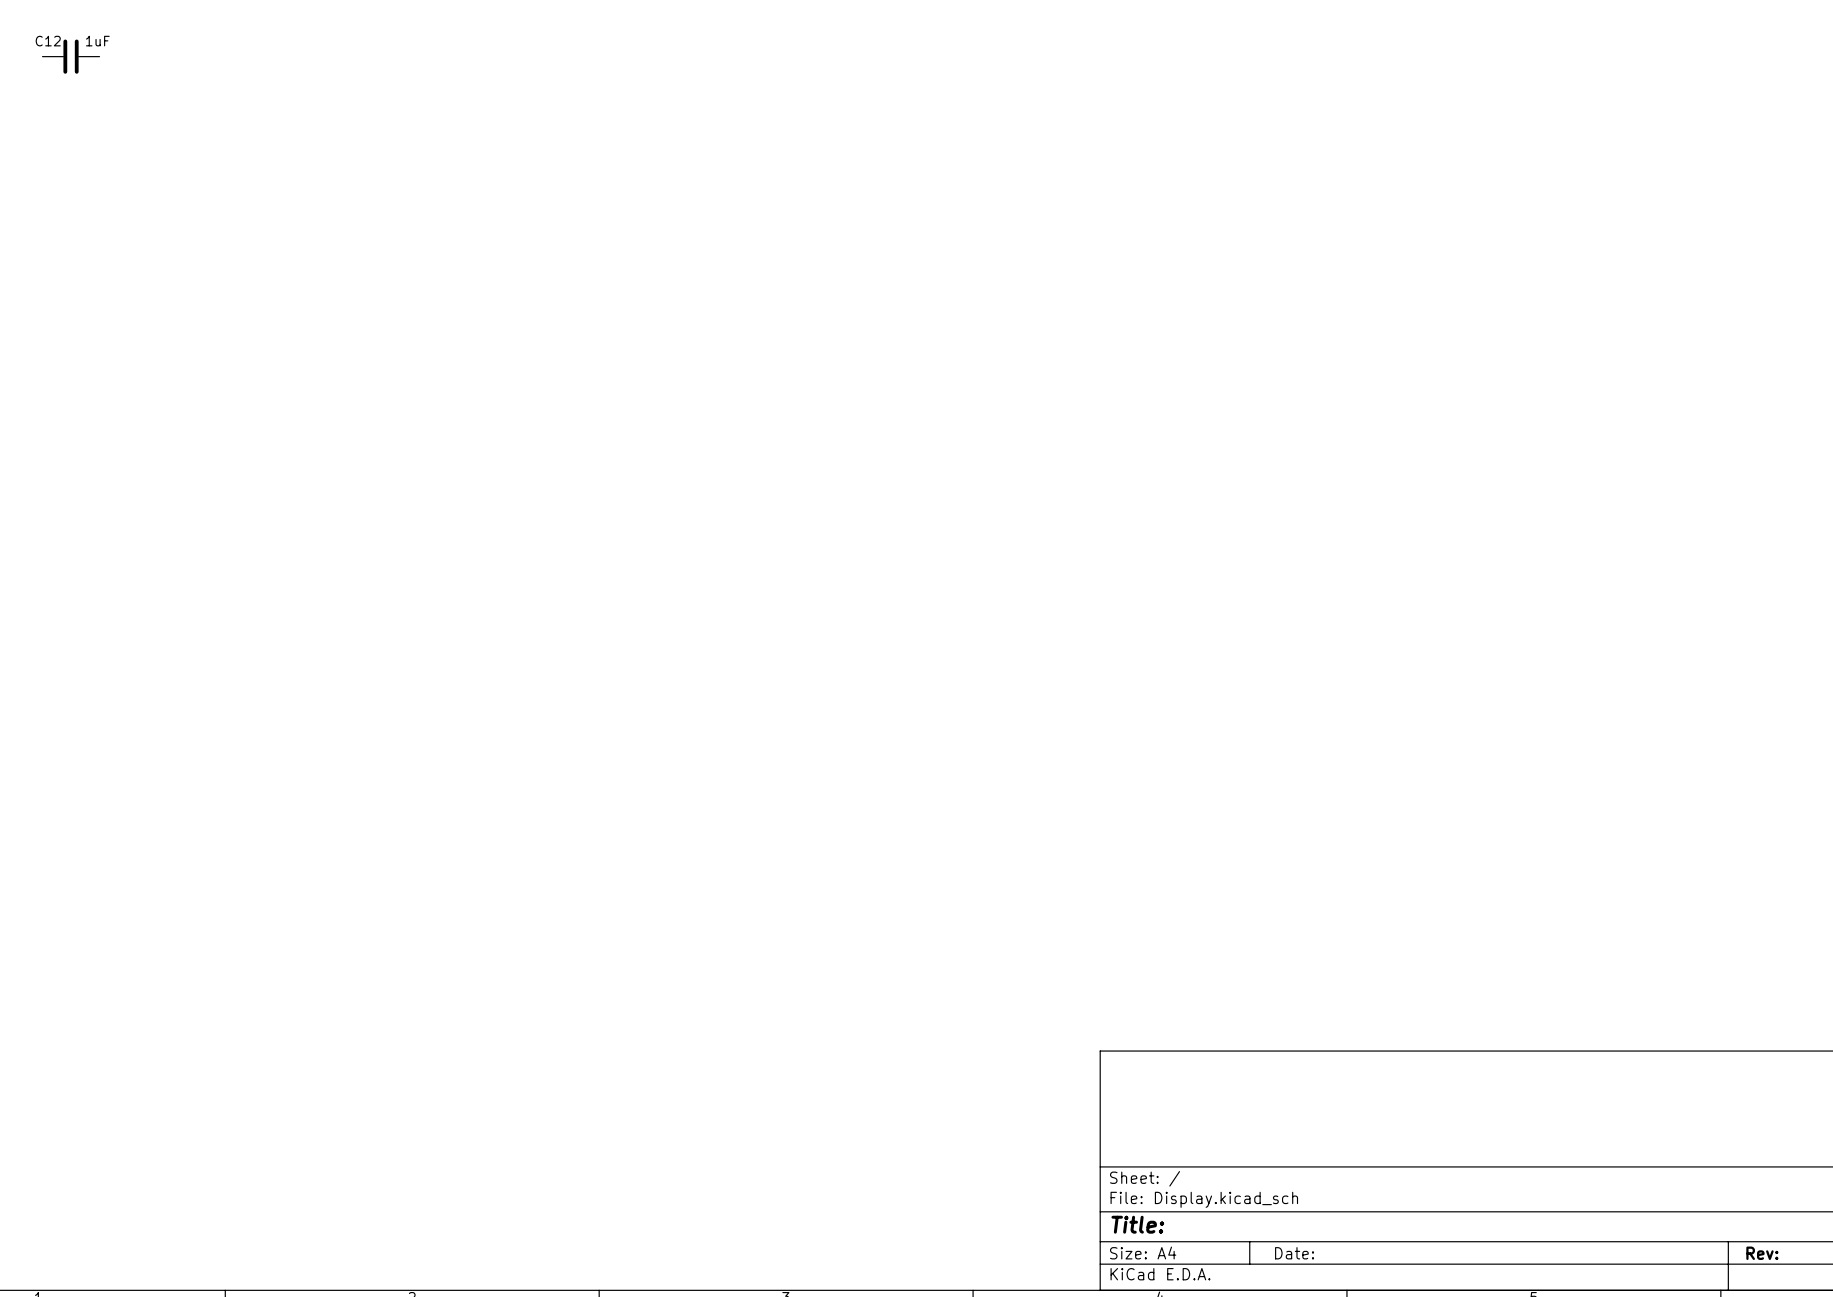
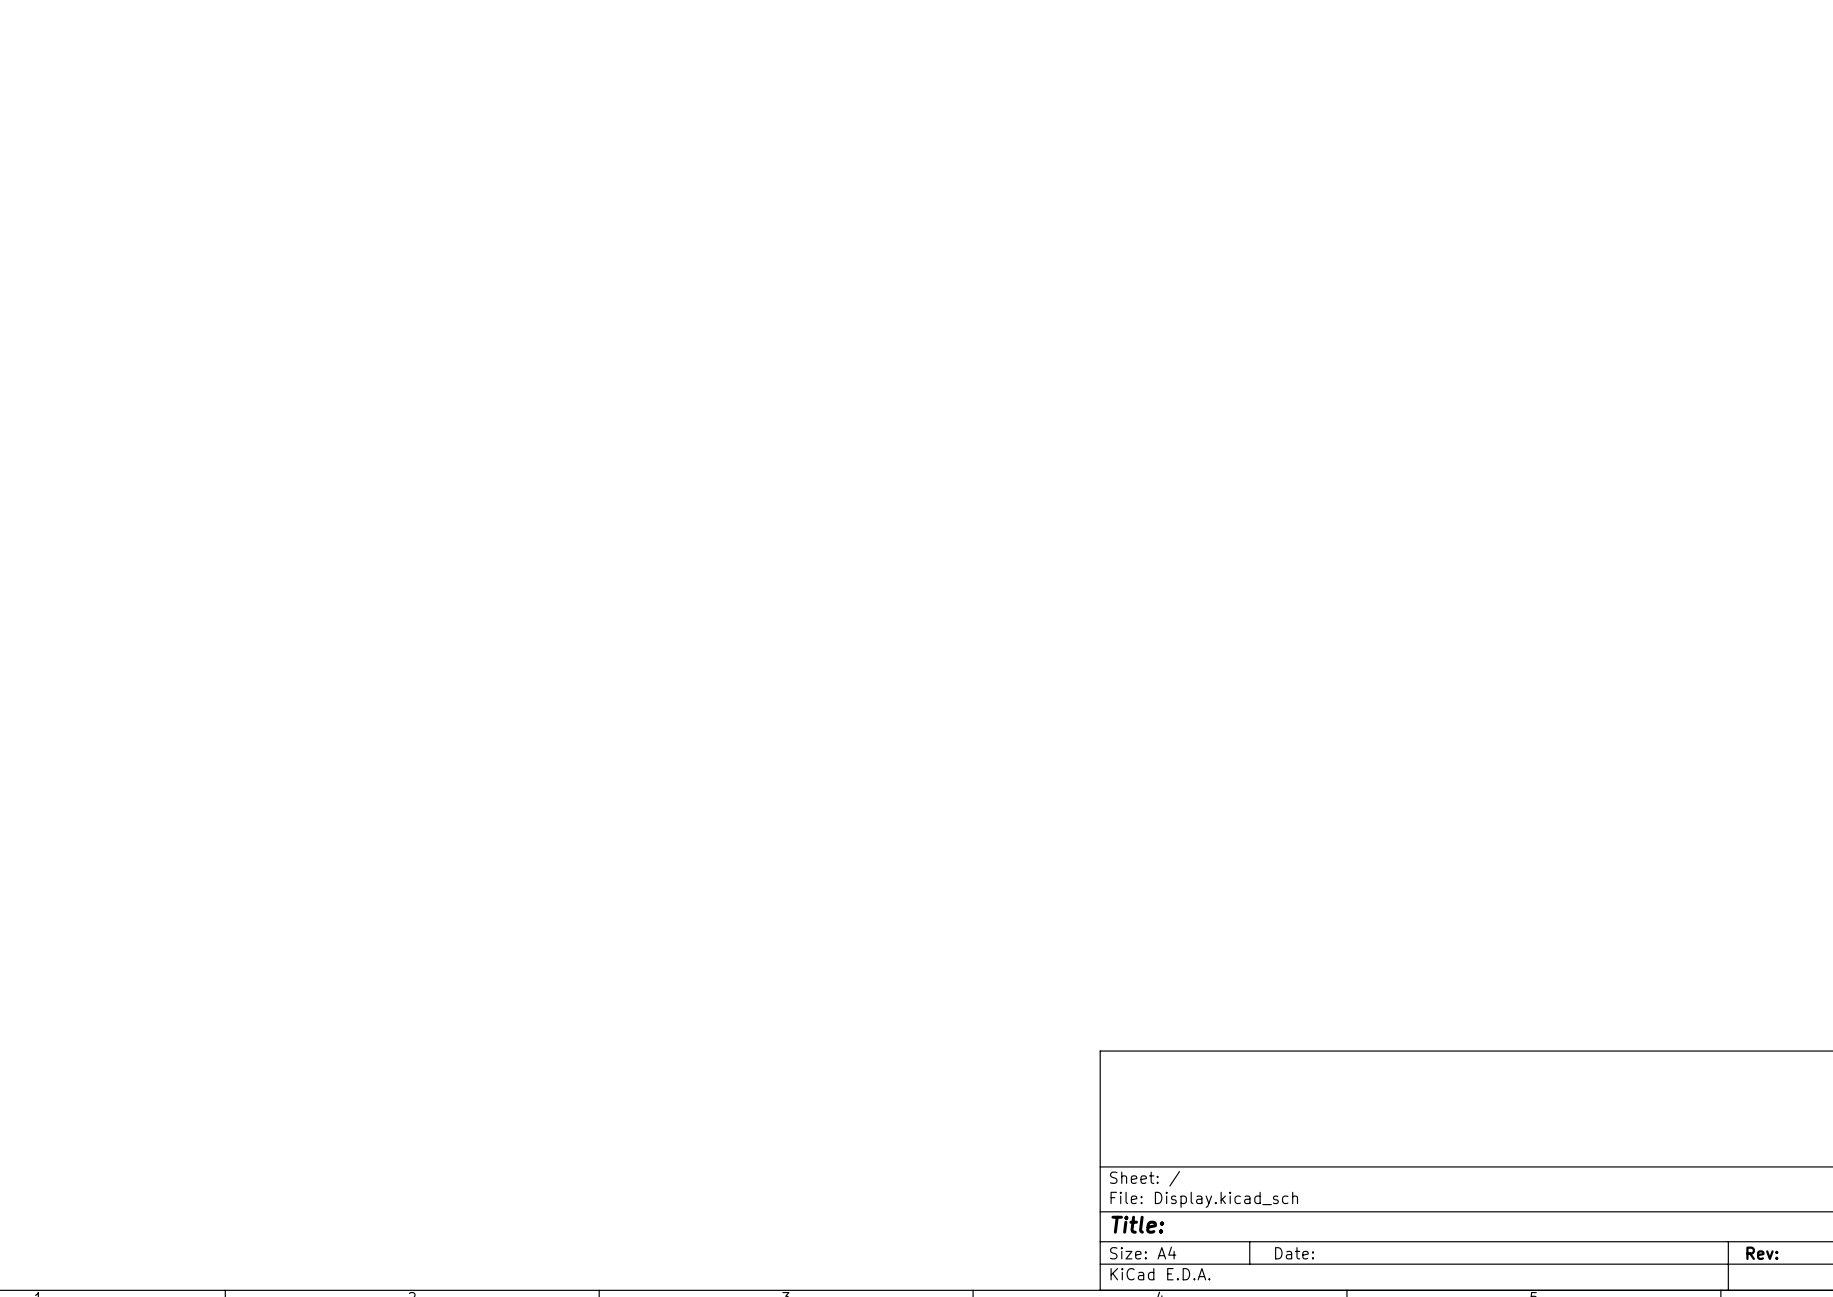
C12: 1uF (71, 56) -> none

